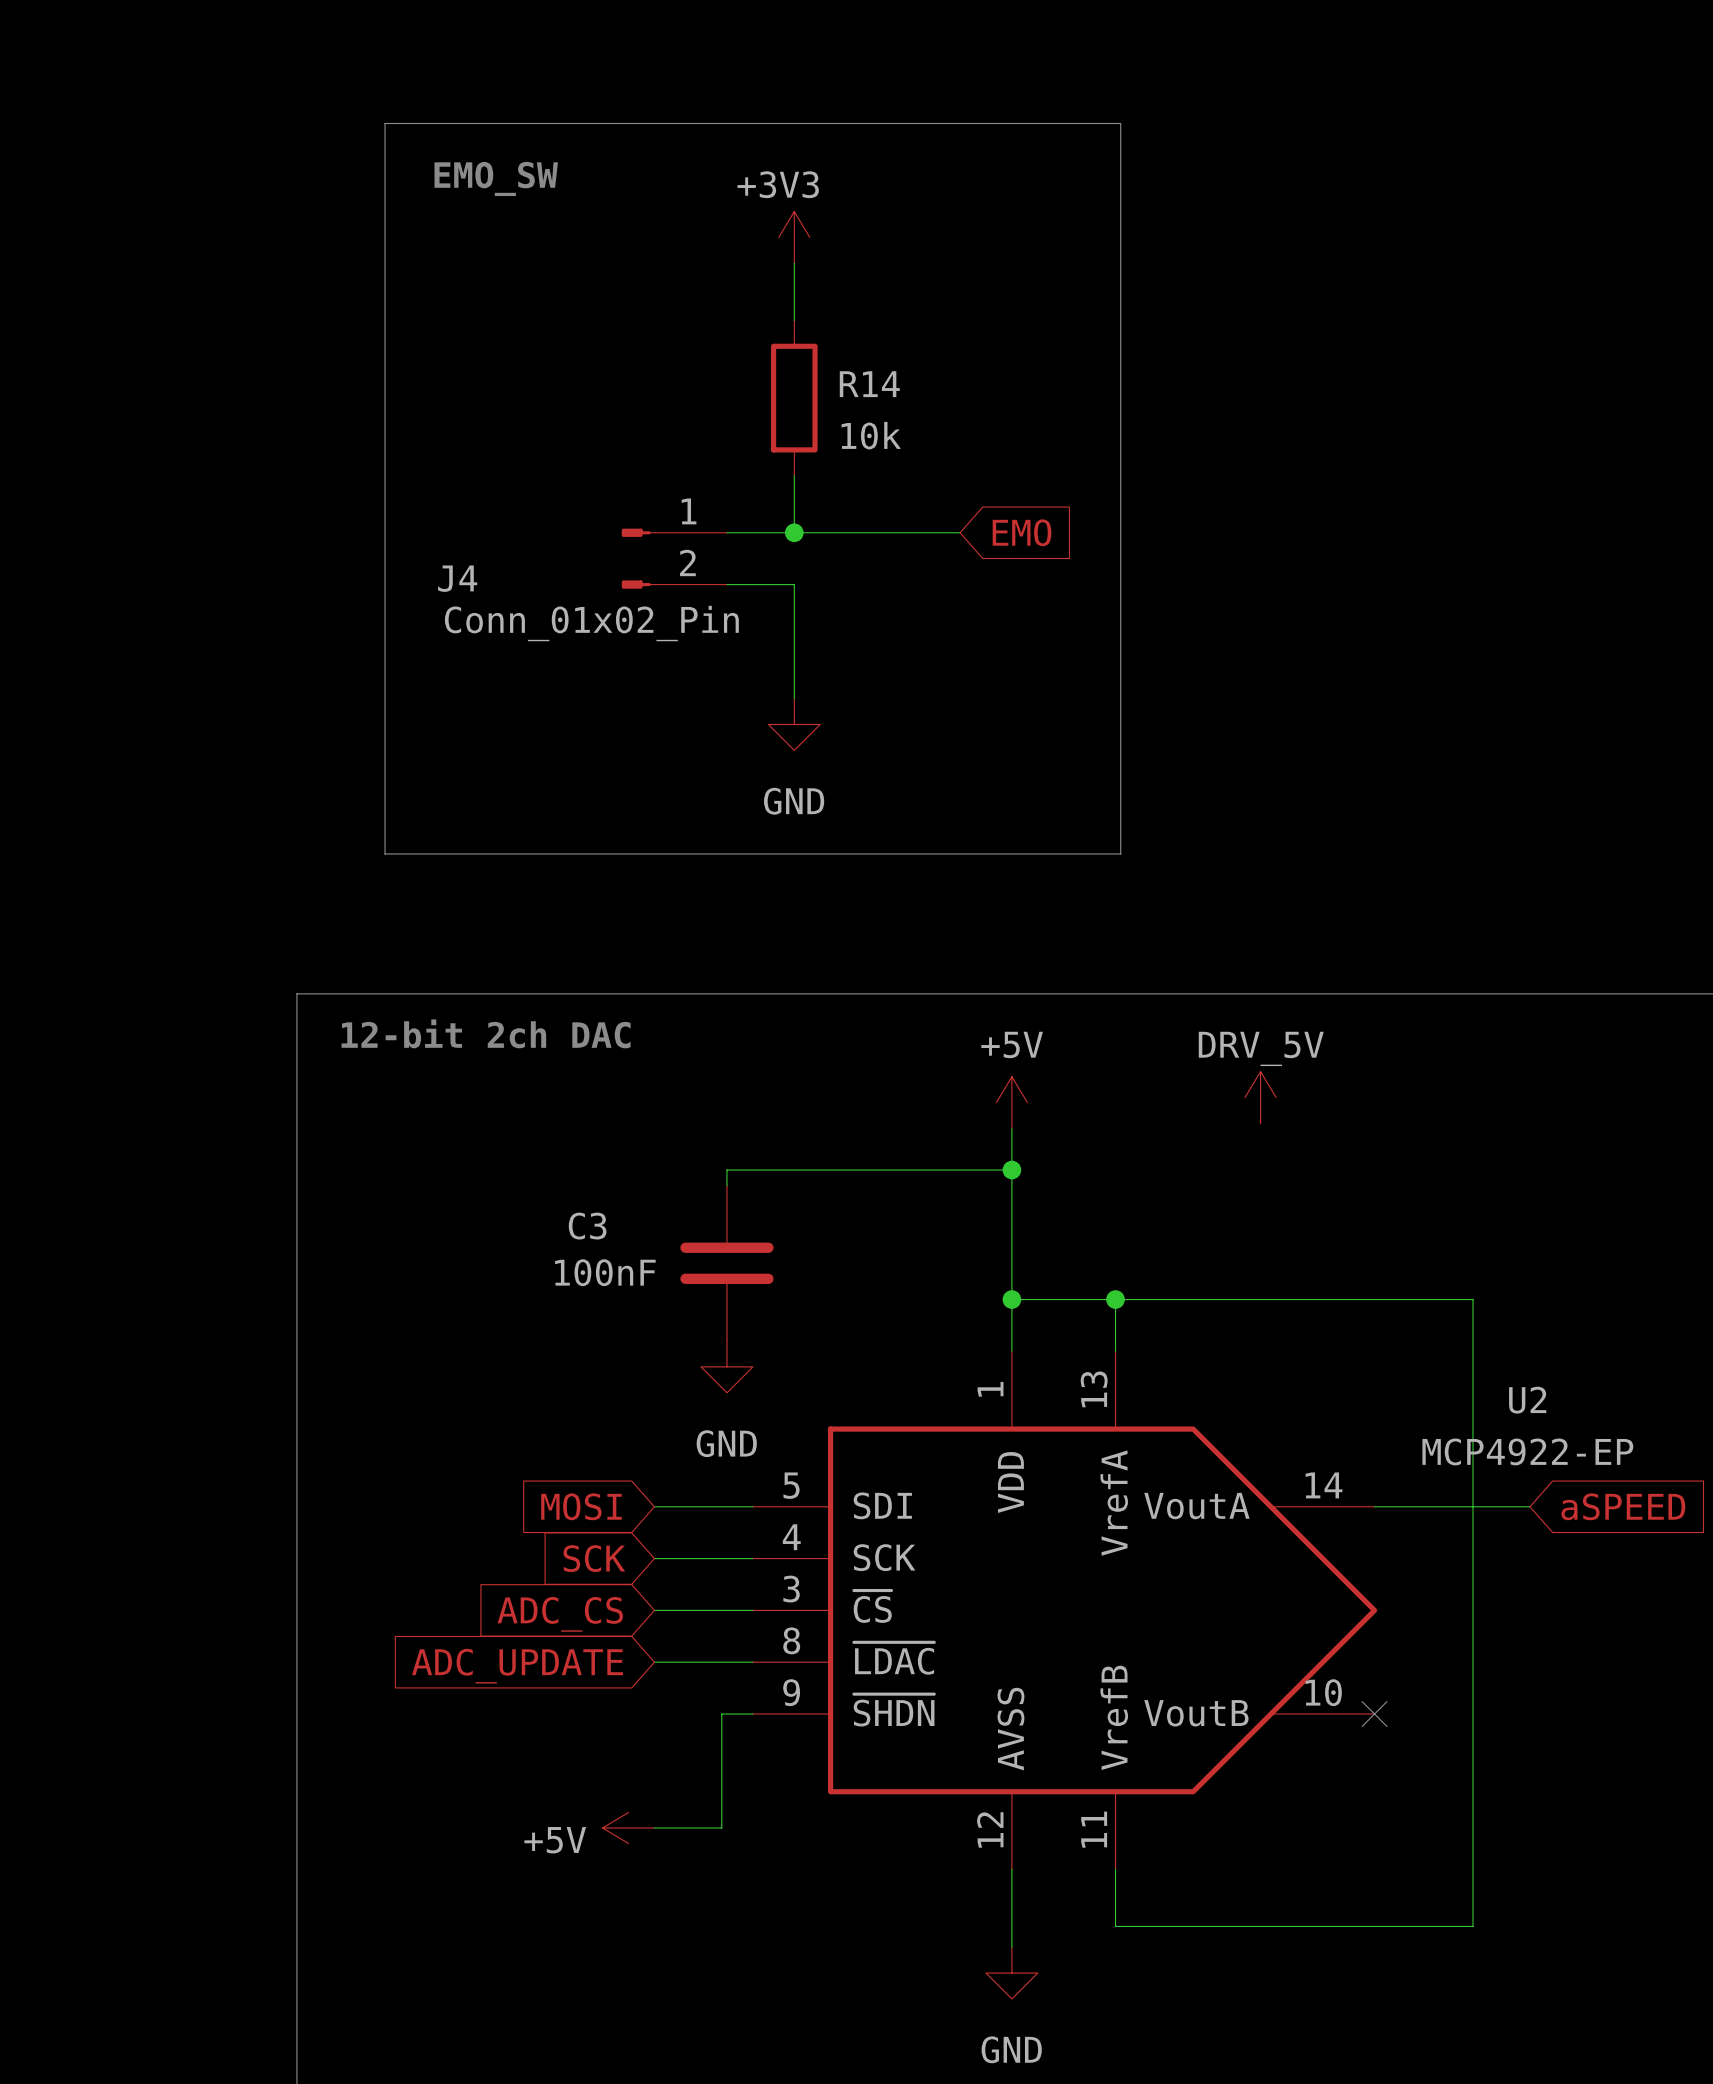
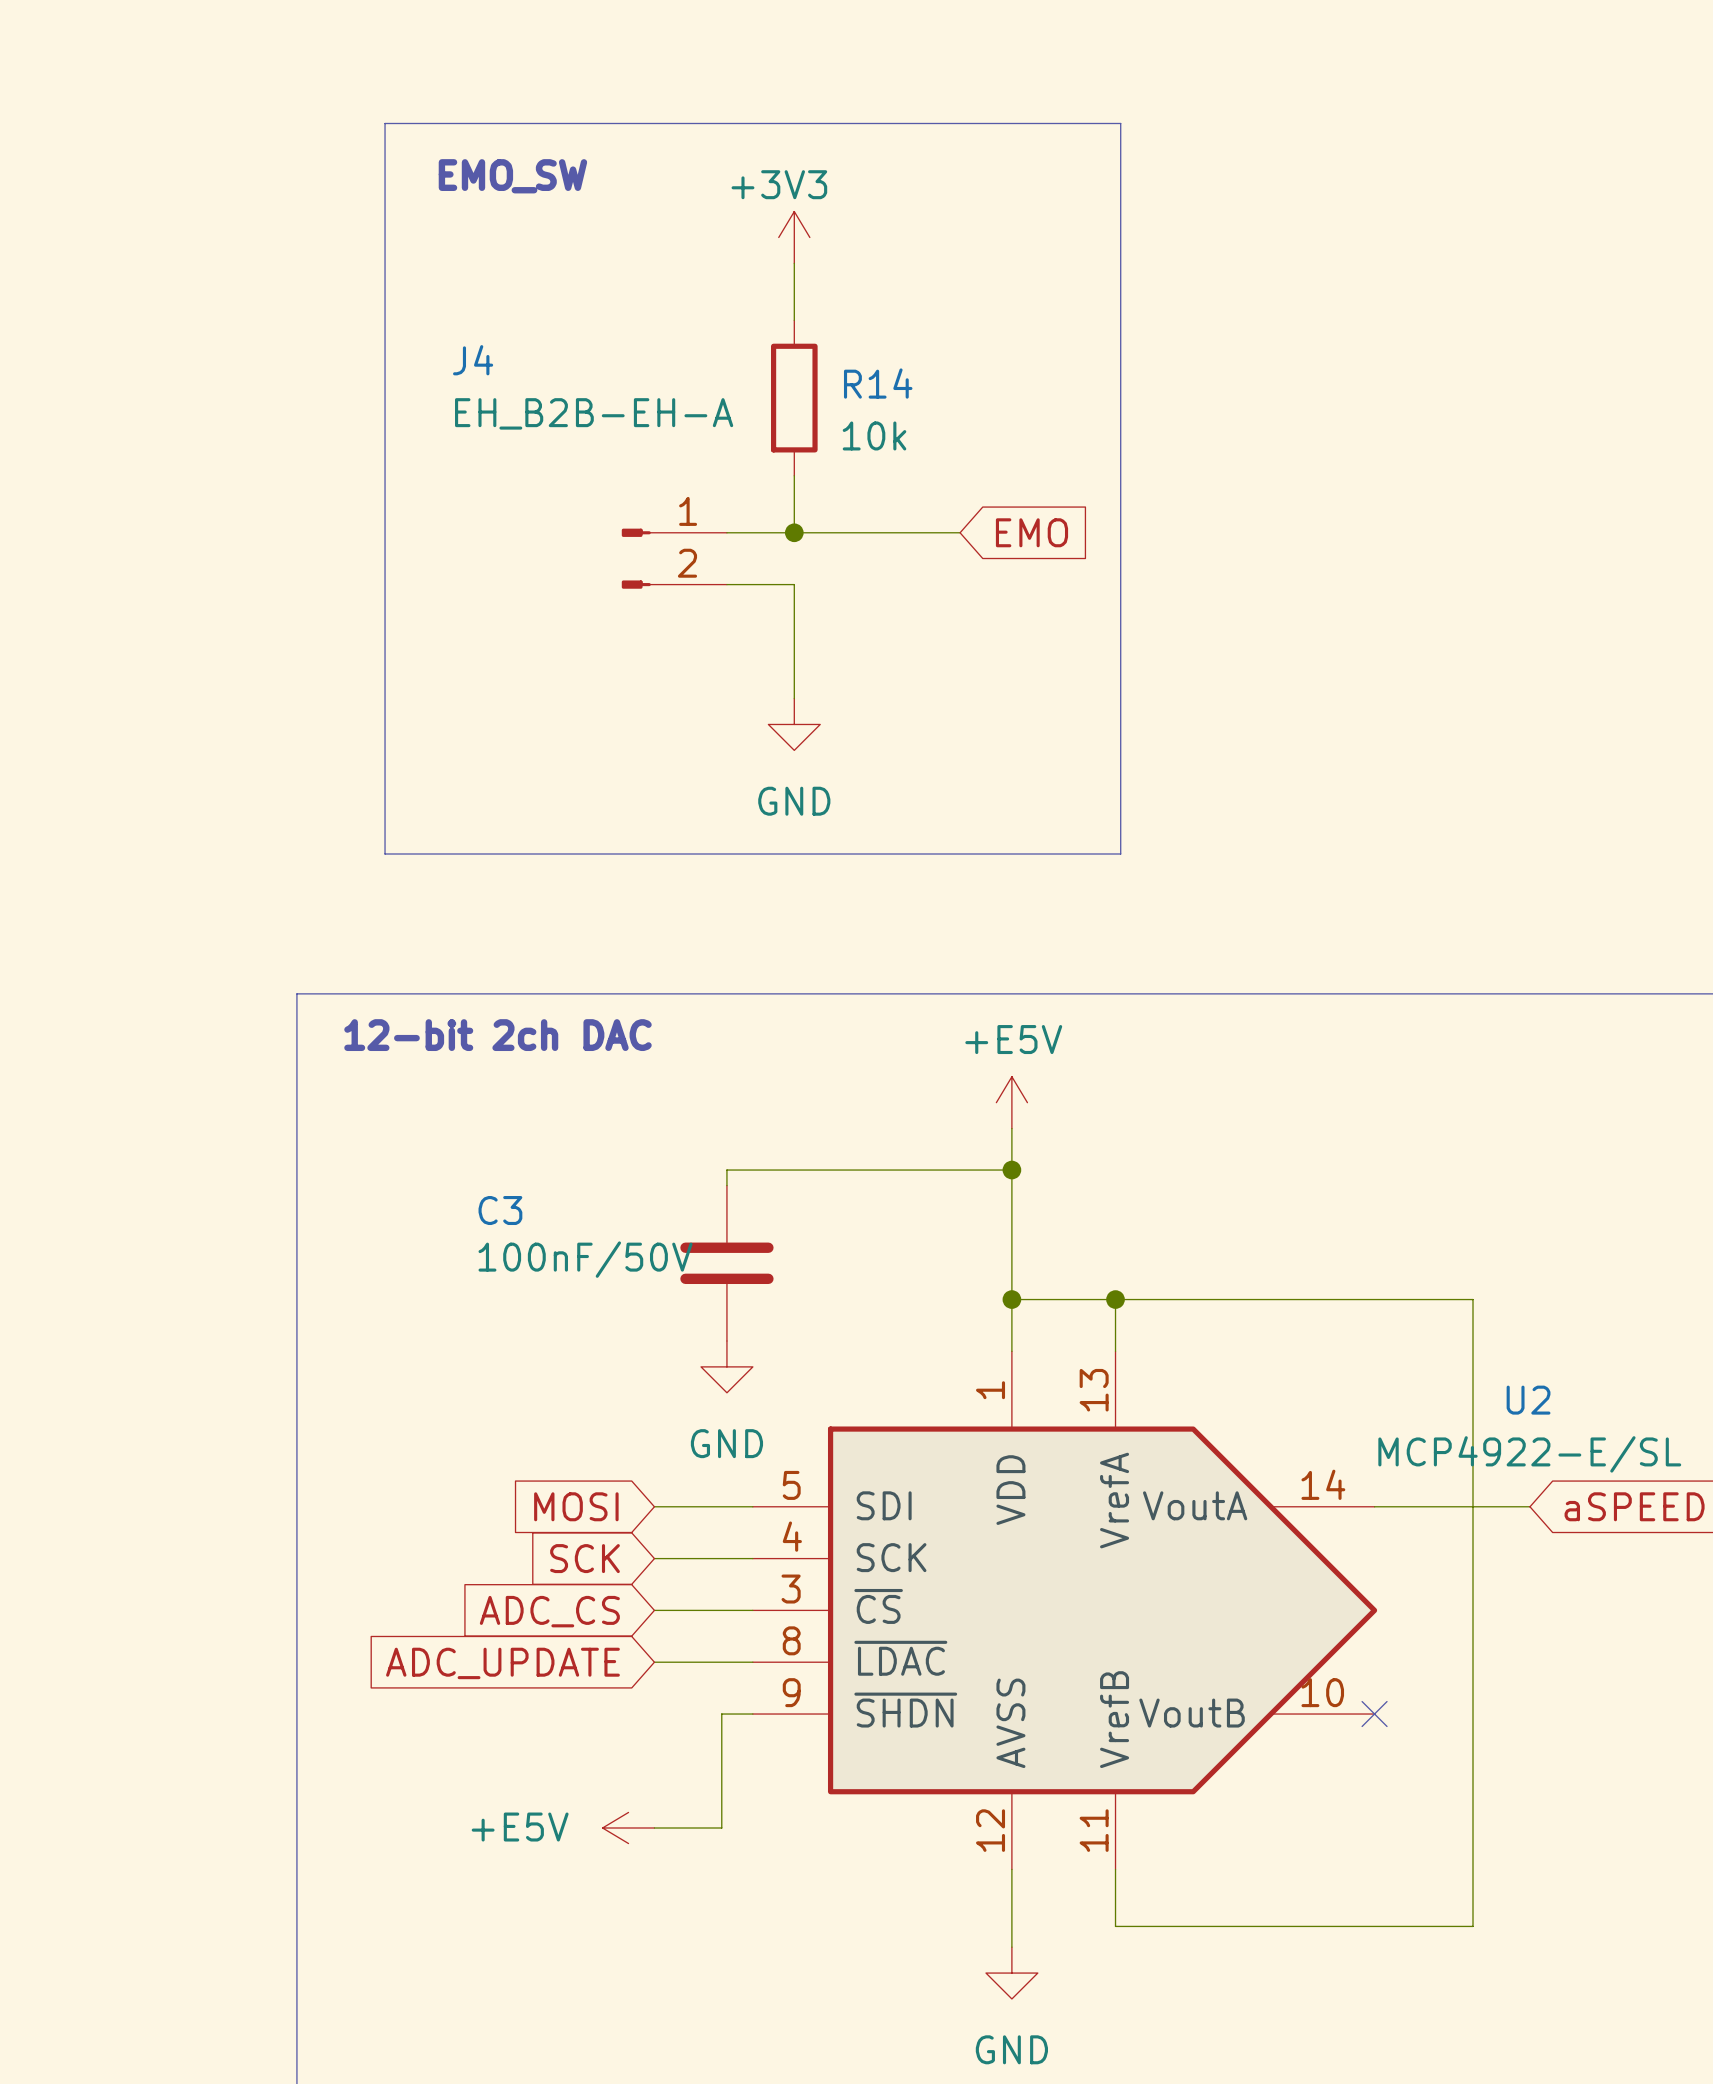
J4 name position: J4 (457, 578) -> J4 (473, 360)
J4 value: Conn_01x02_Pin (591, 623) -> EH_B2B-EH-A (594, 413)
power symbol: DRV_5V (1260, 1097) -> none
power symbol: +5V (1011, 1102) -> +E5V (1011, 1102)
C3 name position: C3 (587, 1226) -> C3 (500, 1210)
C3 value: 100nF (605, 1272) -> 100nF/50V (585, 1259)
U2 value: MCP4922-EP (1527, 1451) -> MCP4922-E/SL (1529, 1454)
power symbol: +5V (628, 1827) -> +E5V (628, 1827)

